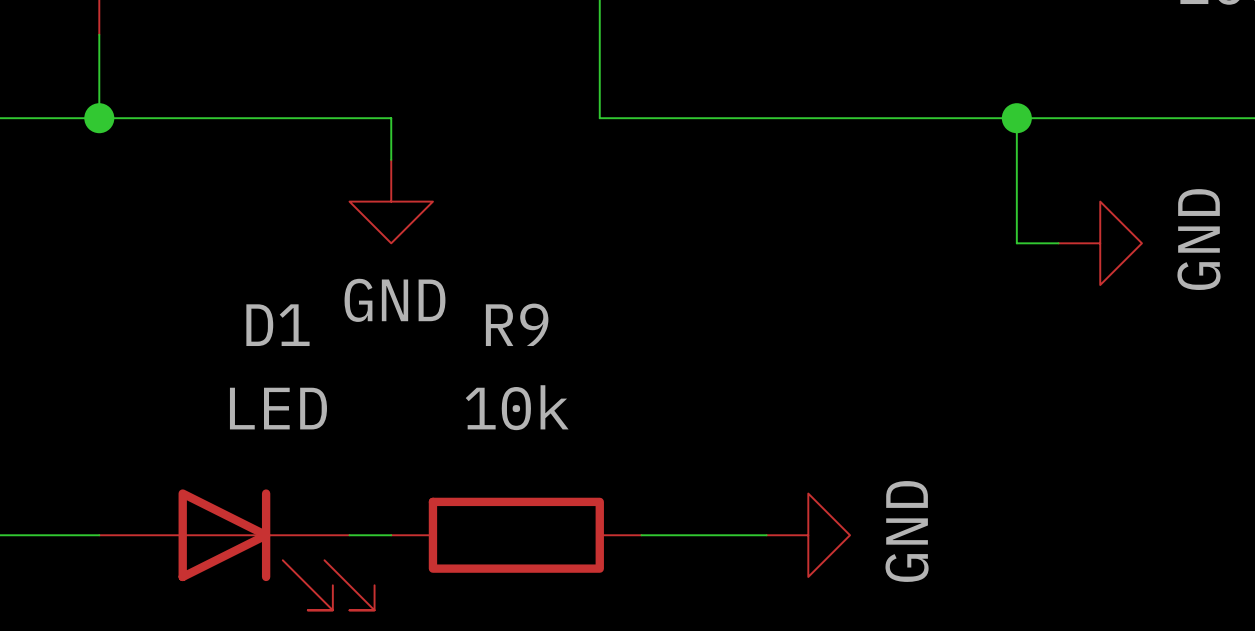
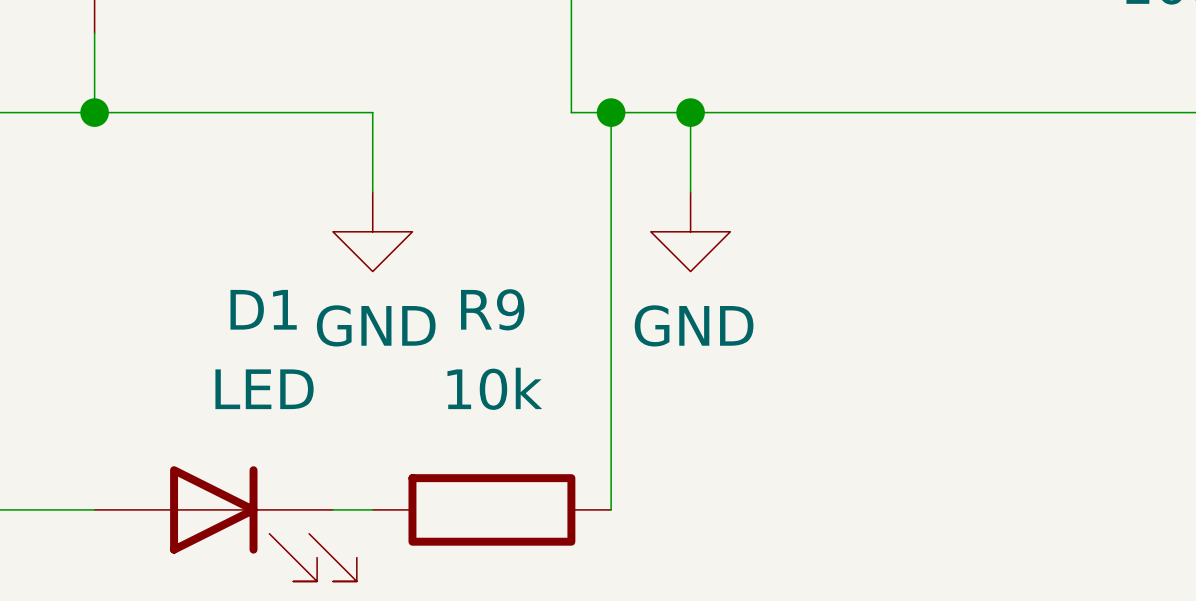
junction: none -> (611, 112)
wire: none -> (690, 112) (690, 192)
junction: none -> (690, 112)
wire: (1016, 118) (1016, 243) (1058, 243) -> none
junction: (1016, 118) -> none
power symbol position: GND (391, 201) -> GND (372, 231)
power symbol: none -> GND (690, 231)
power symbol: GND (1100, 243) -> none
wire: (641, 535) (766, 535) -> (611, 509) (611, 112)
power symbol: GND (808, 535) -> none

